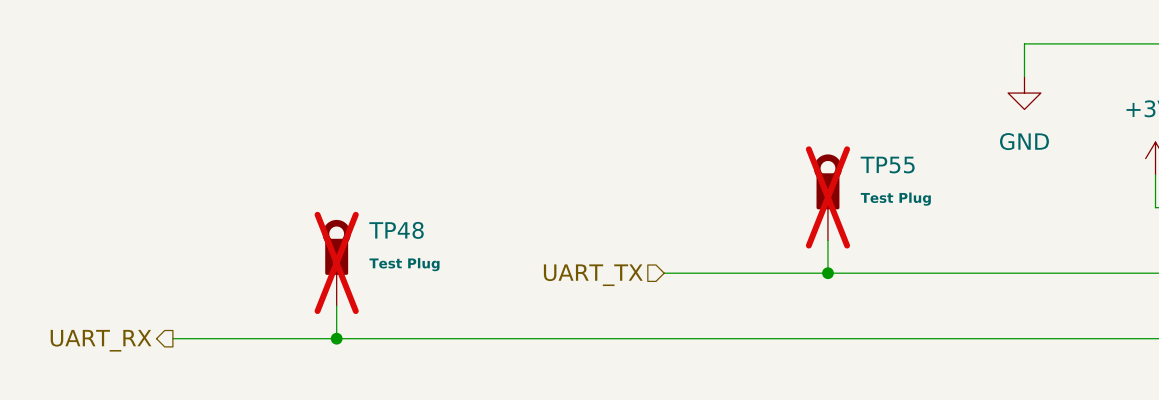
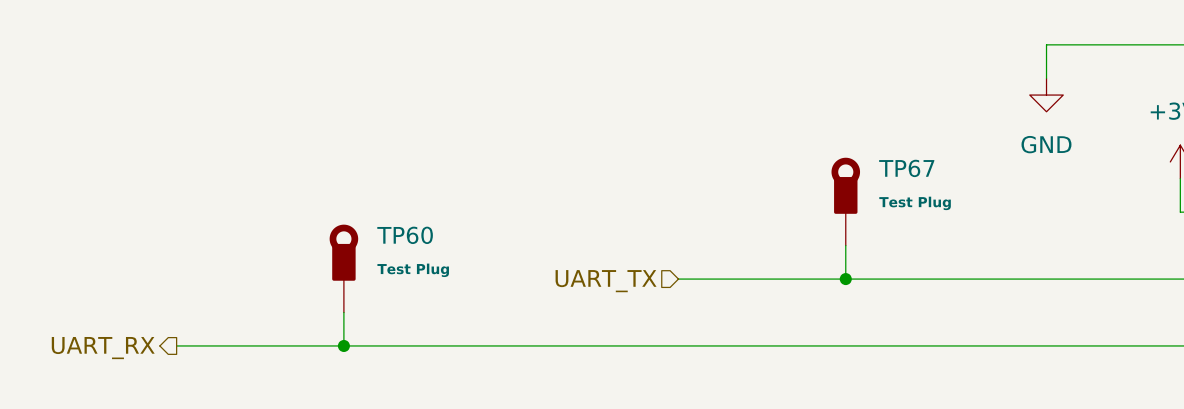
TP55 name: TP55 (887, 165) -> TP67 (906, 168)
TP55 do-not-place cross: (827, 197) -> none
TP48 name: TP48 (396, 230) -> TP60 (405, 235)
TP48 do-not-place cross: (336, 262) -> none

